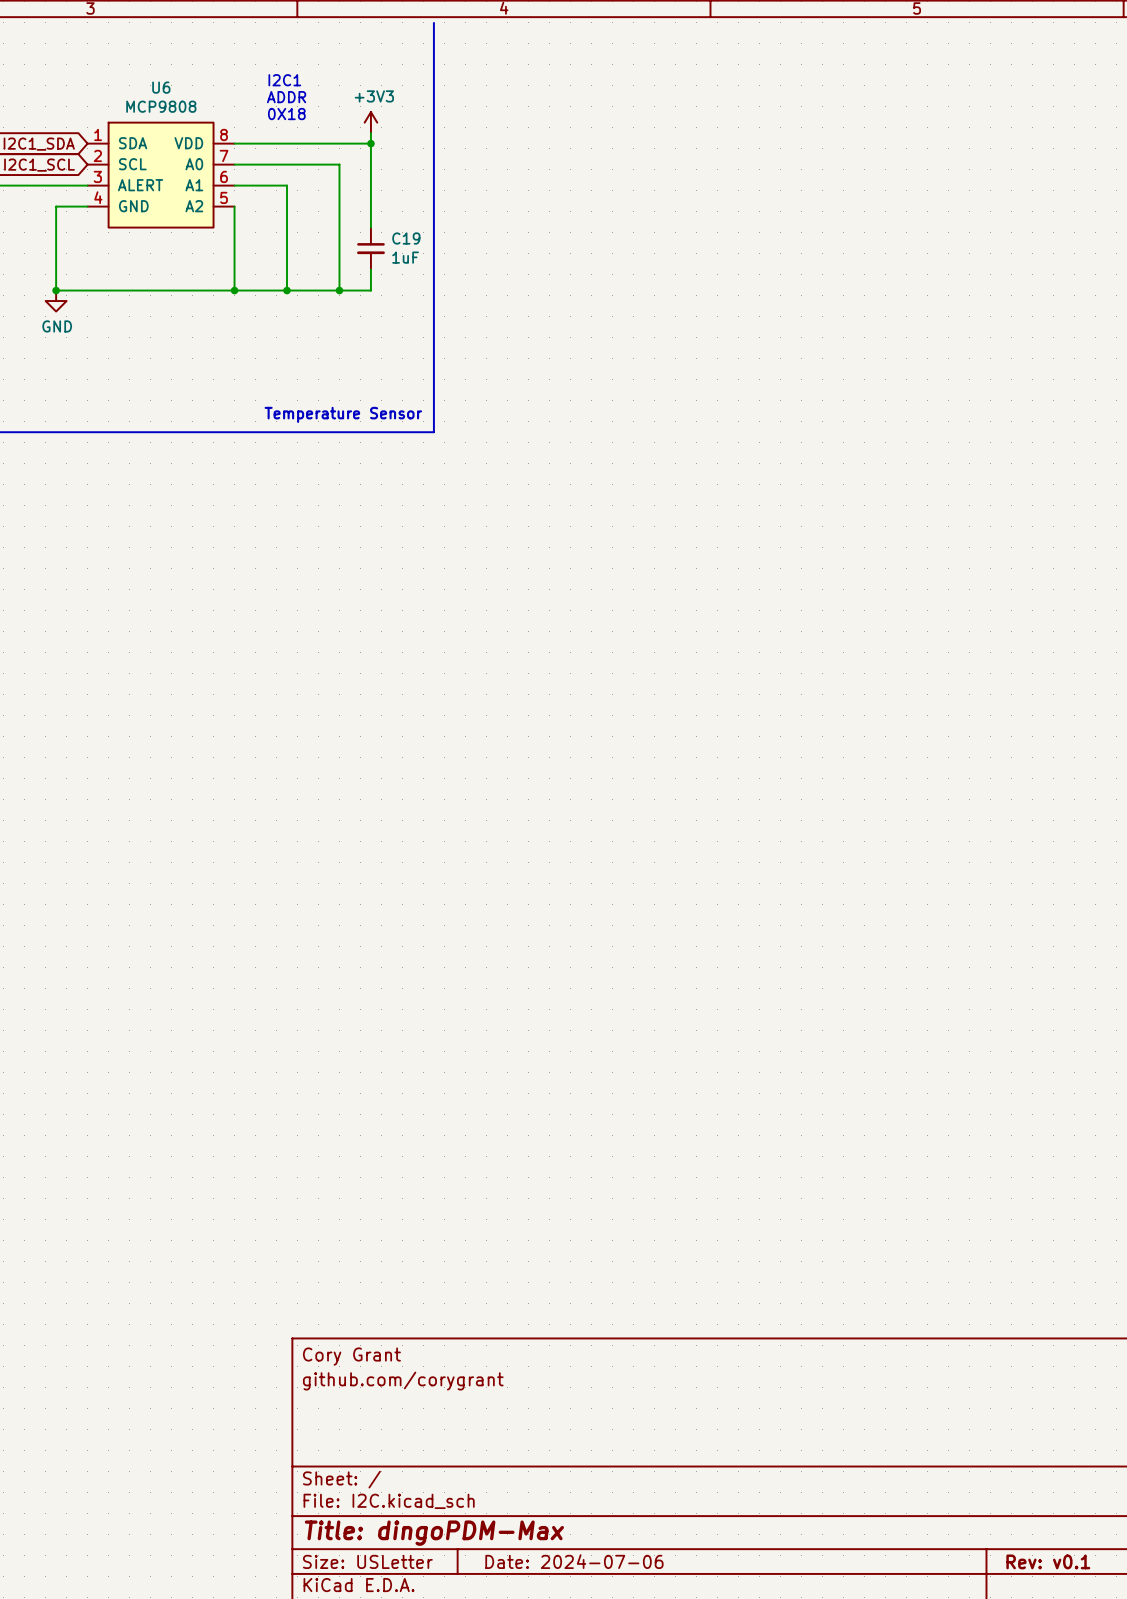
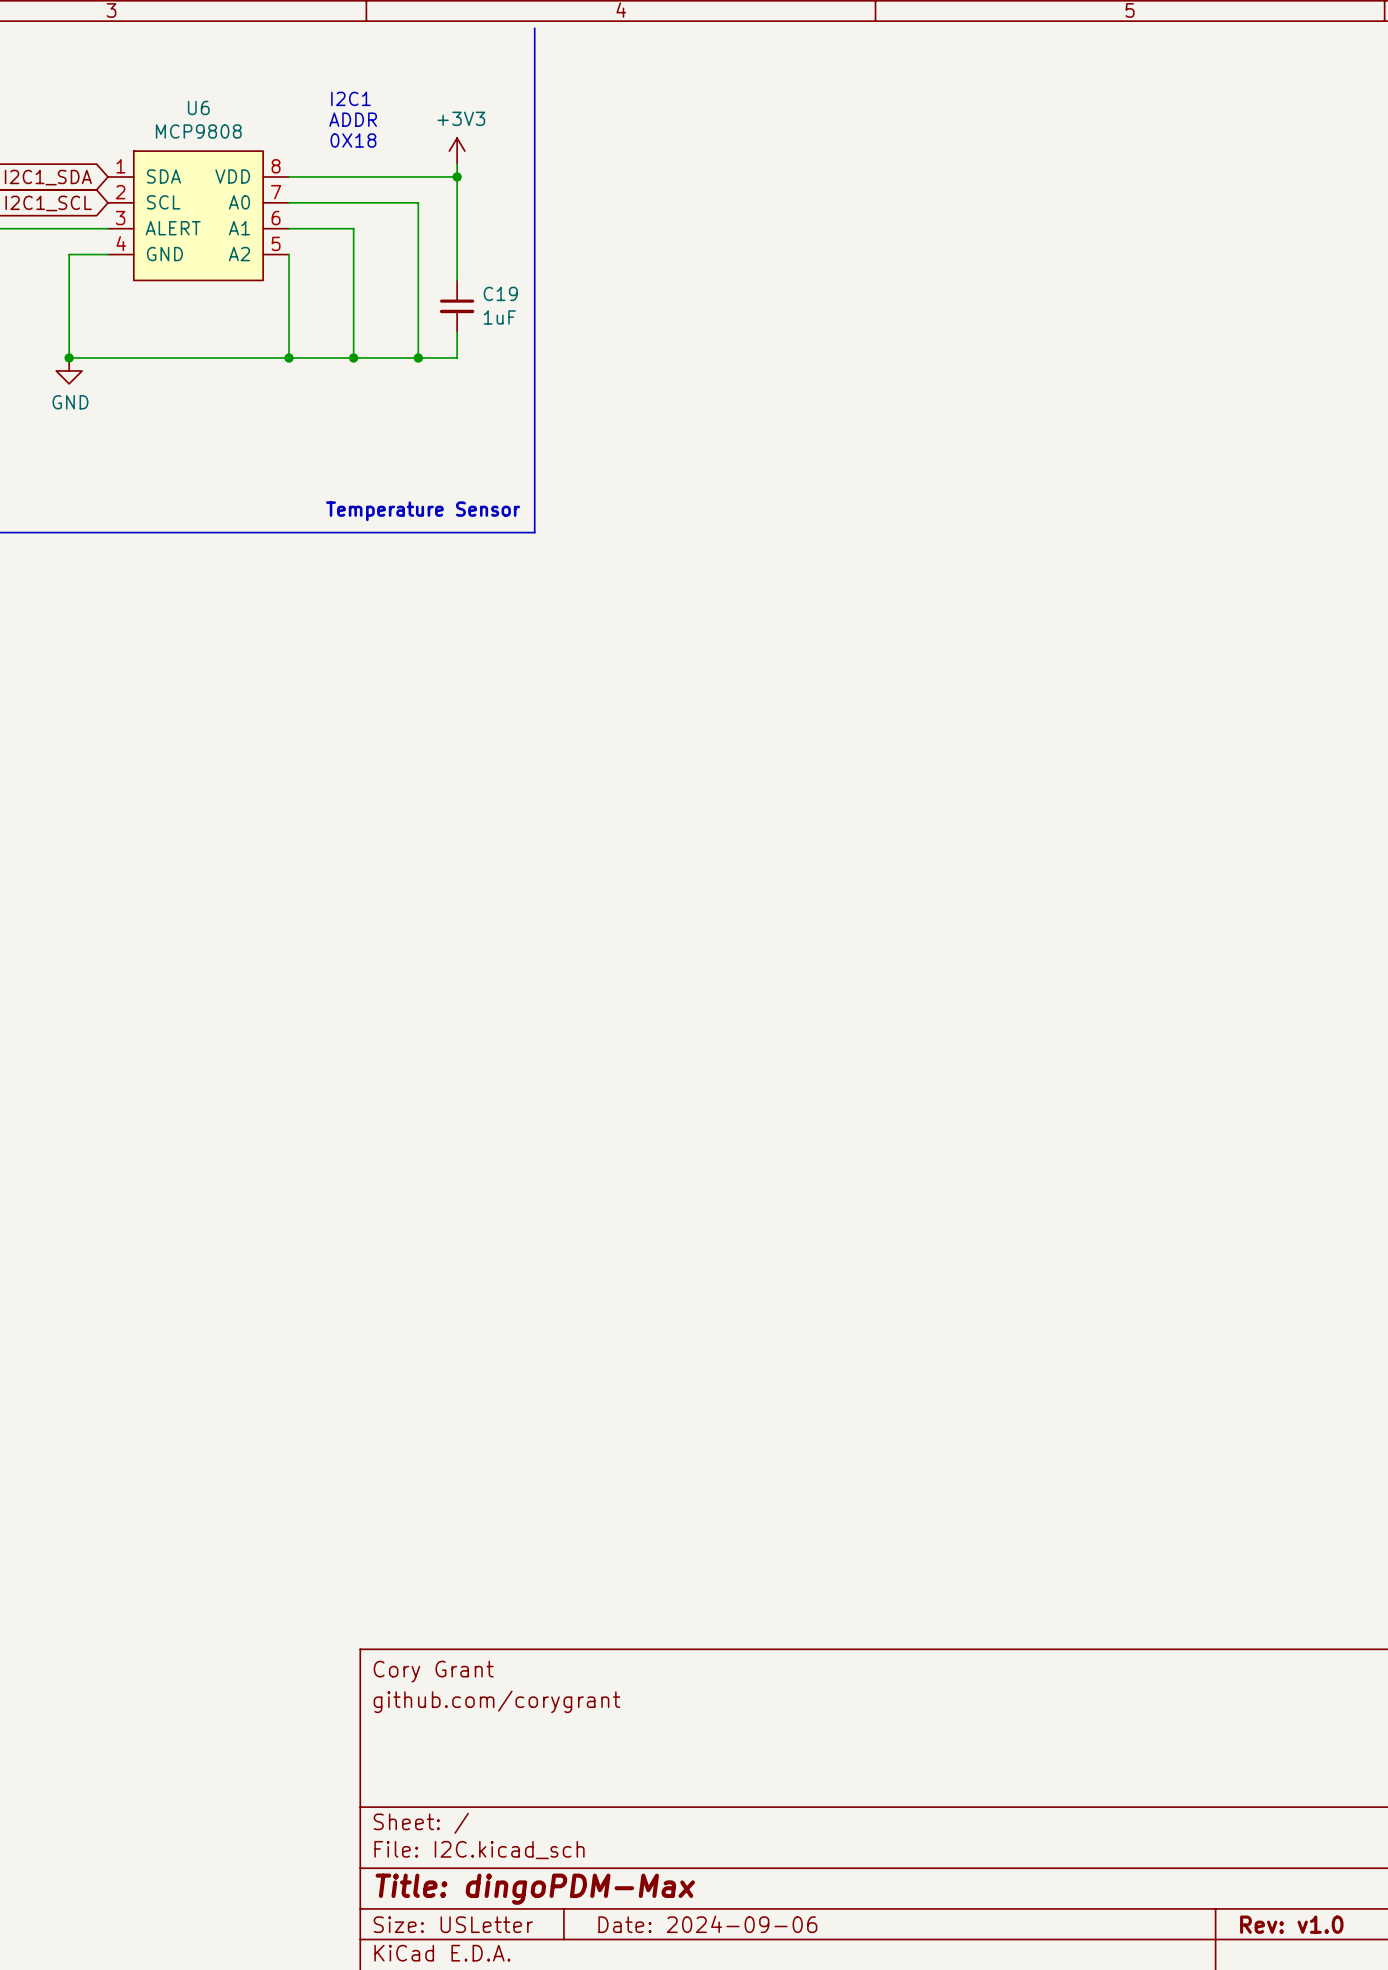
title block: Date: 2024-07-06 (574, 1561) -> Date: 2024-09-06 (707, 1924)
title block: Rev: v0.1 (1048, 1561) -> Rev: v1.0 (1291, 1924)

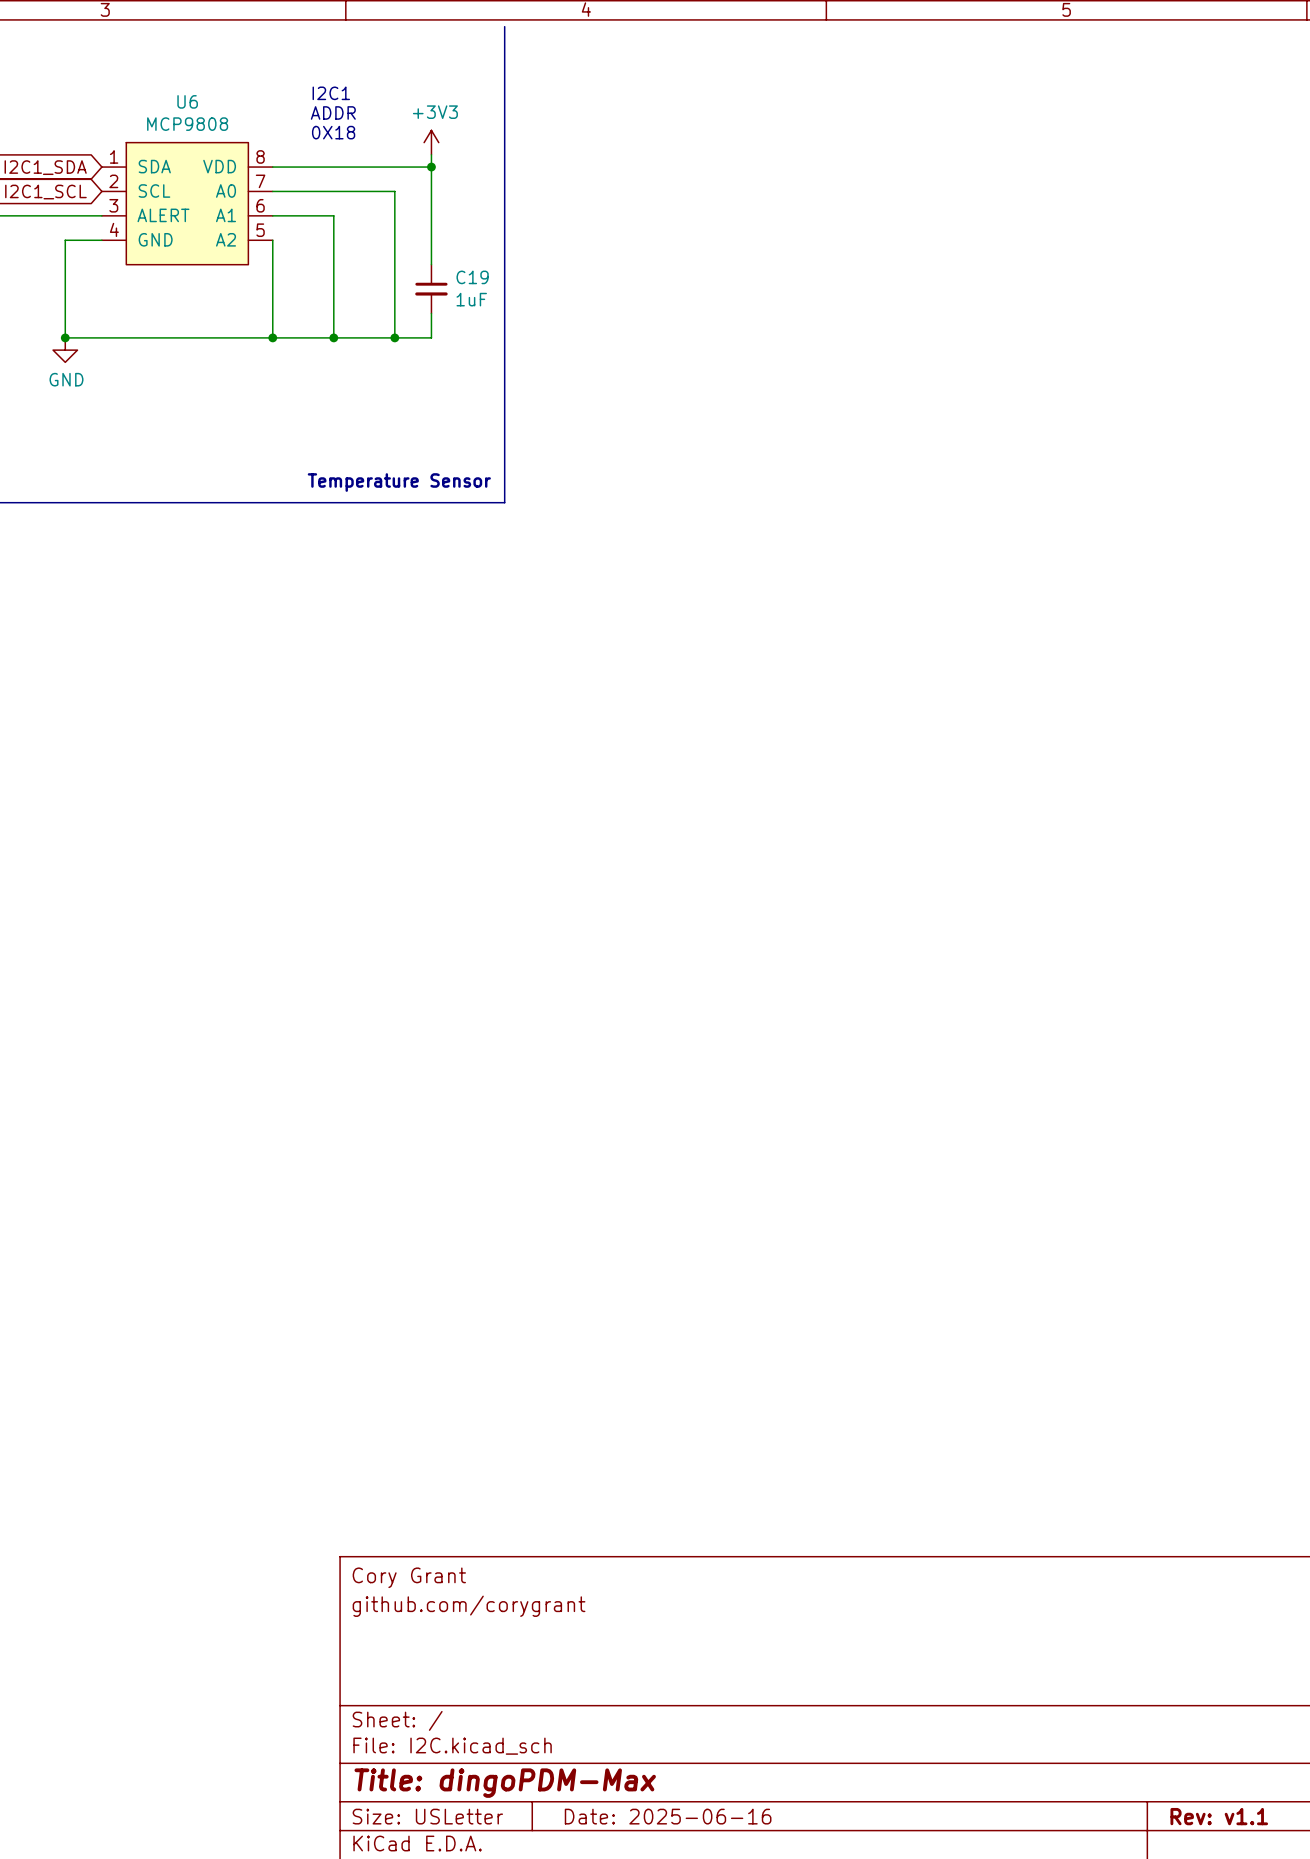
title block: Date: 2024-09-06 (707, 1924) -> Date: 2025-06-16 (668, 1816)
title block: Rev: v1.0 (1291, 1924) -> Rev: v1.1 (1219, 1816)

